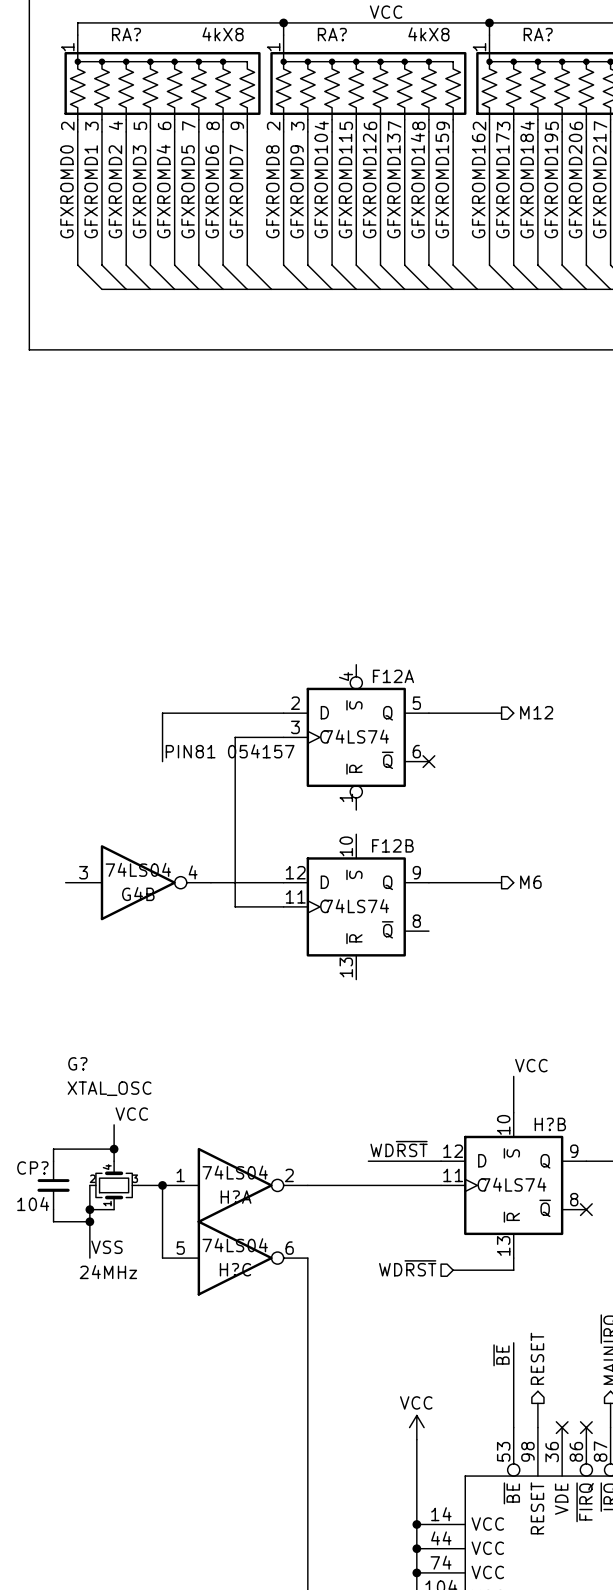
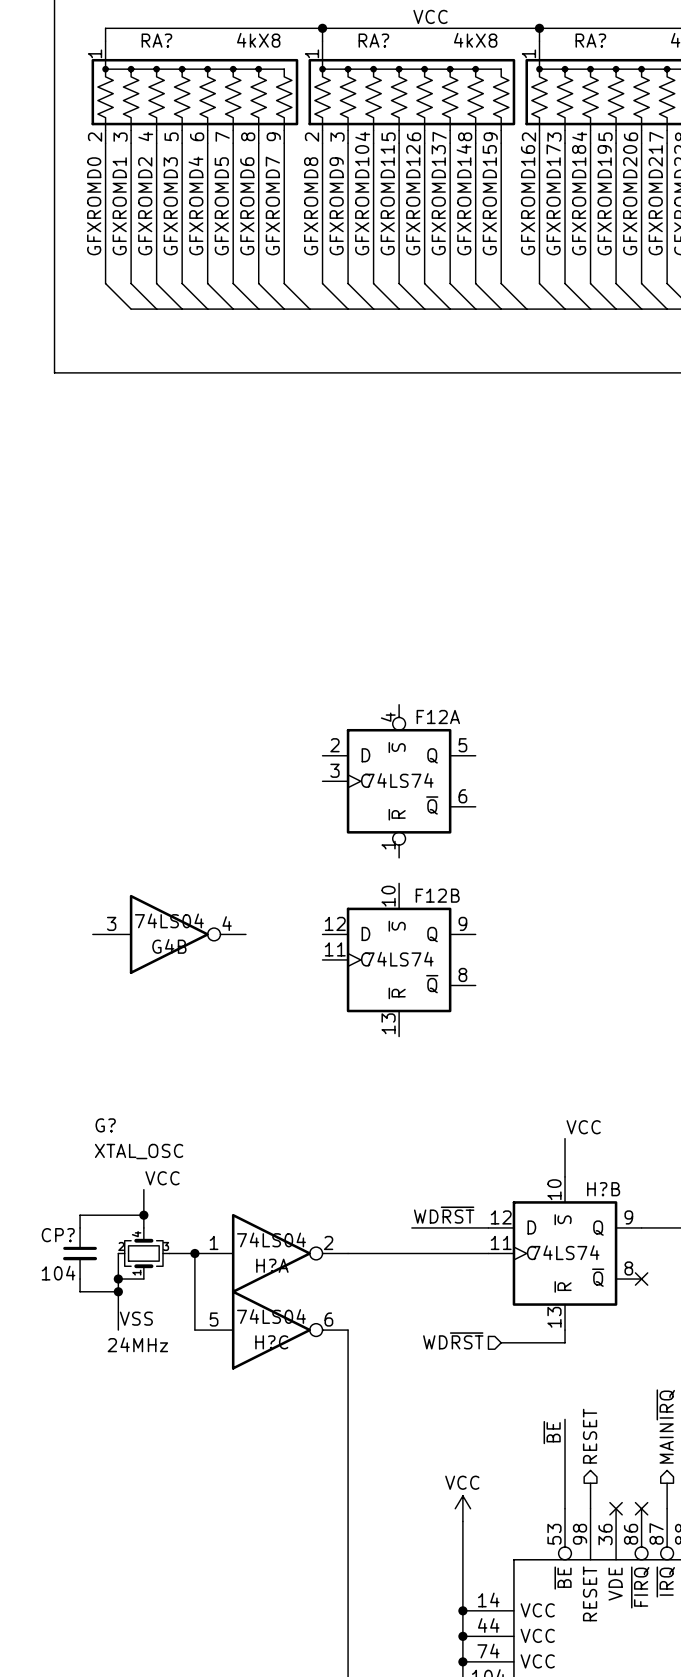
hierarchical label: M12 (536, 712) -> none
wire: (283, 713) (162, 713) (162, 761) -> none
wire: (428, 713) (501, 713) -> none
wire: (283, 737) (235, 737) (235, 906) (283, 906) -> none
text: PIN81 054157 (230, 751) -> none
no-connect mark: (428, 761) -> none
wire: (210, 882) (283, 882) -> none
wire: (428, 882) (501, 882) -> none
hierarchical label: M6 (530, 882) -> none

